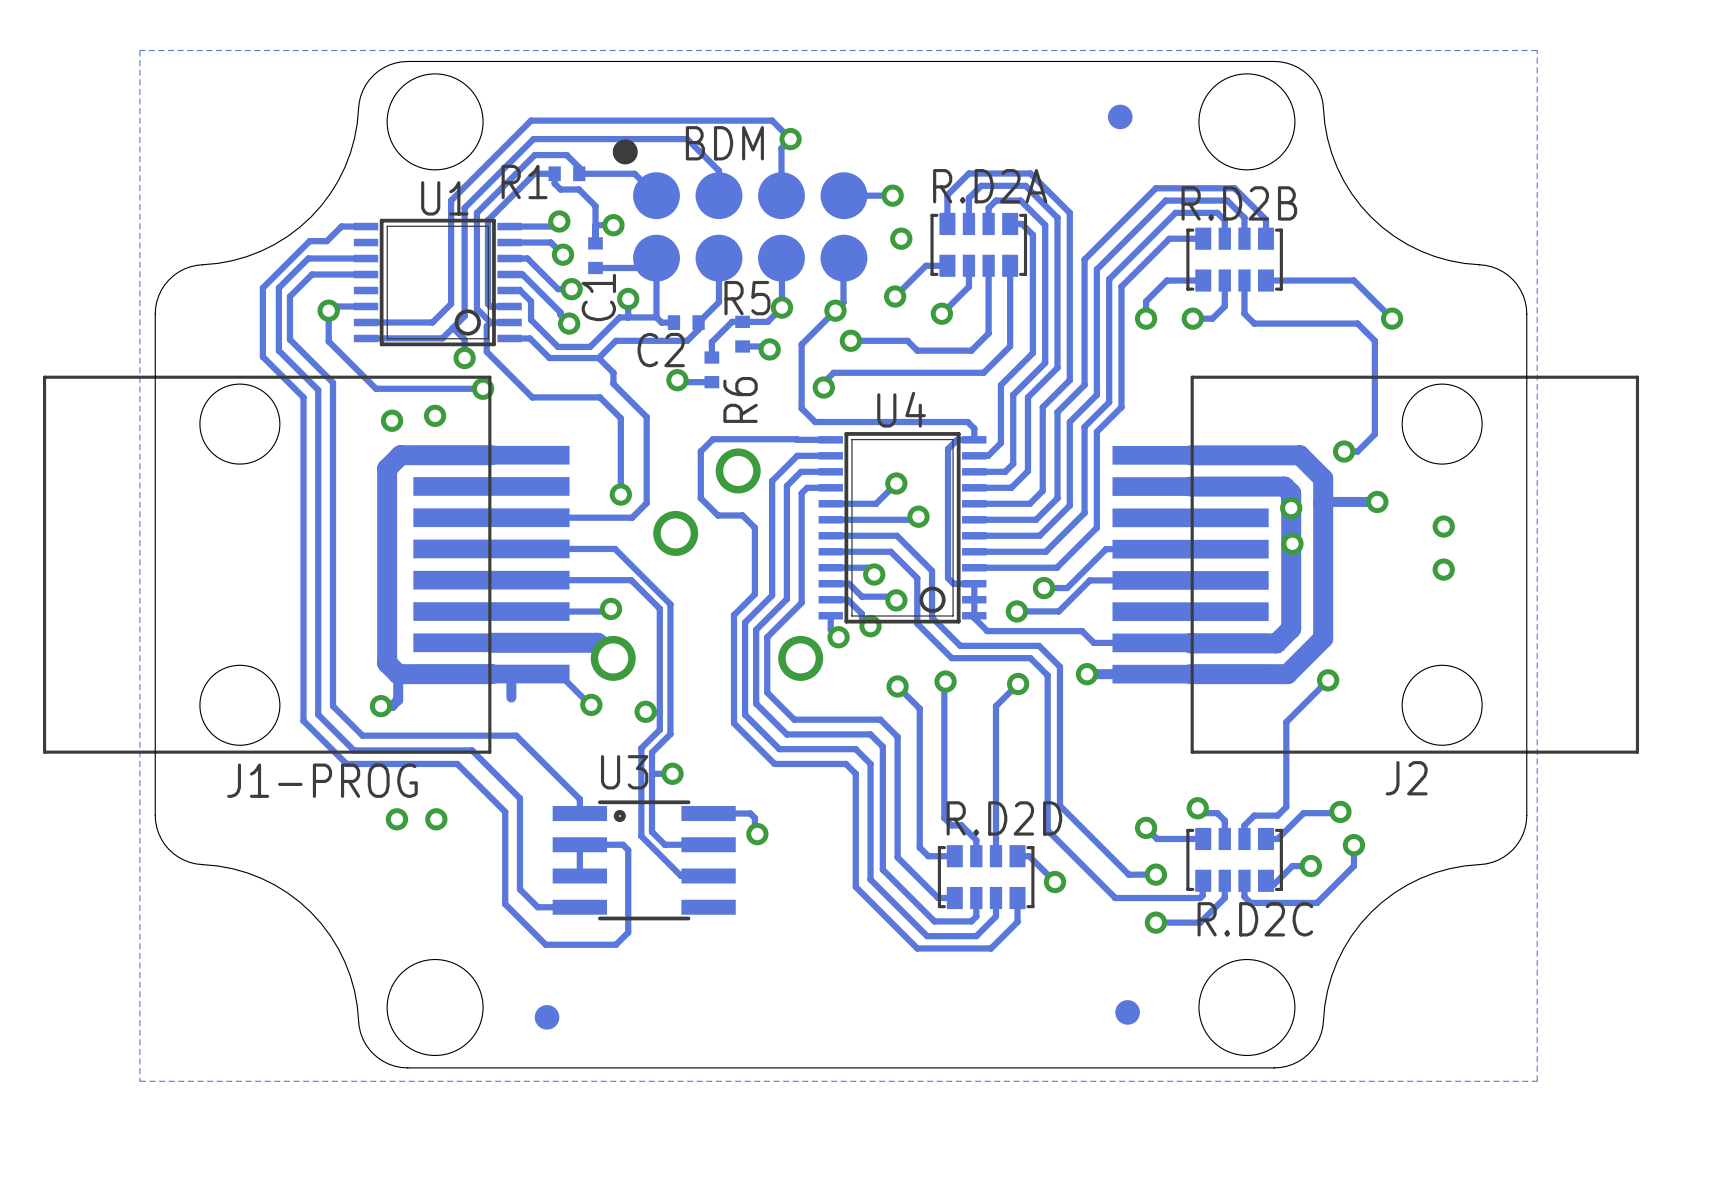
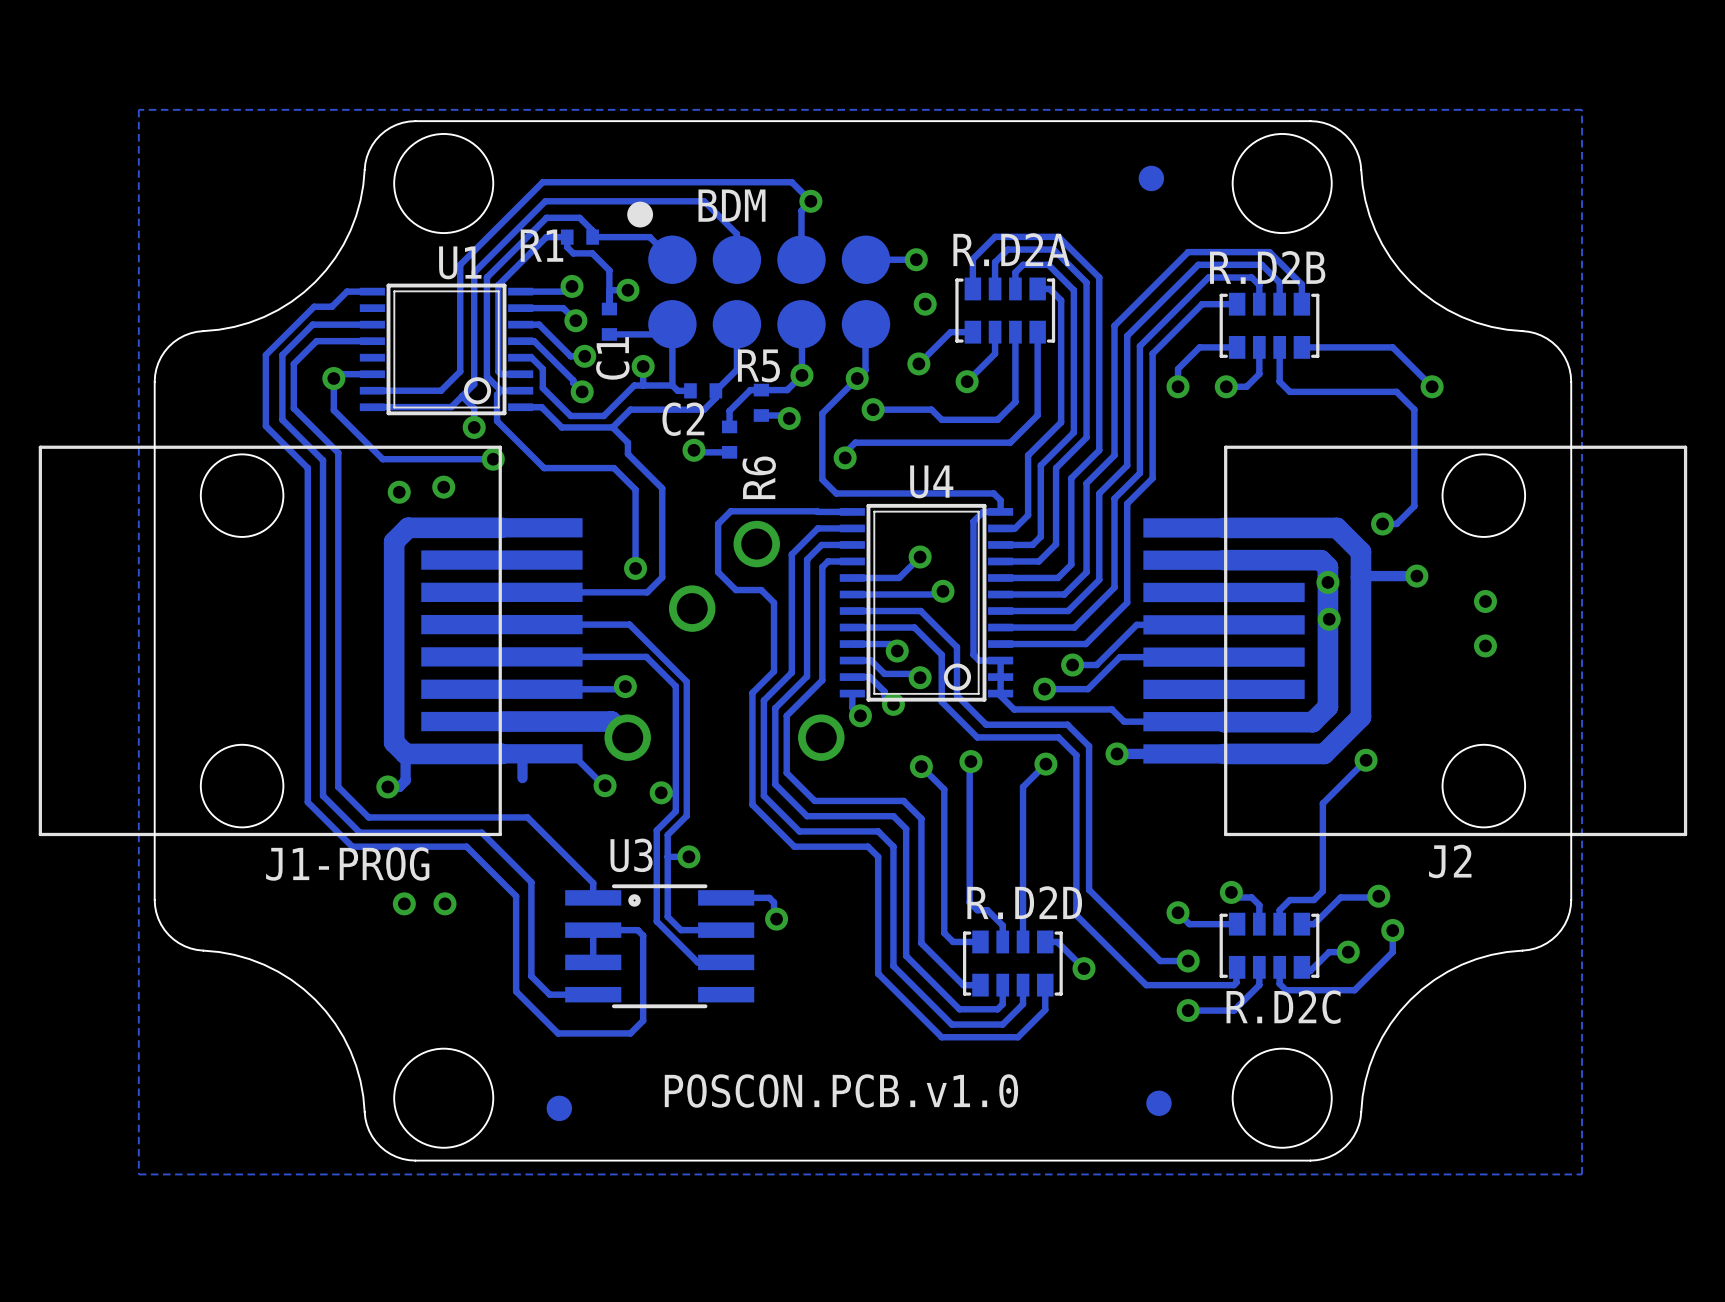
text: none -> POSCON.PCB.v1.0 (841, 1091)

